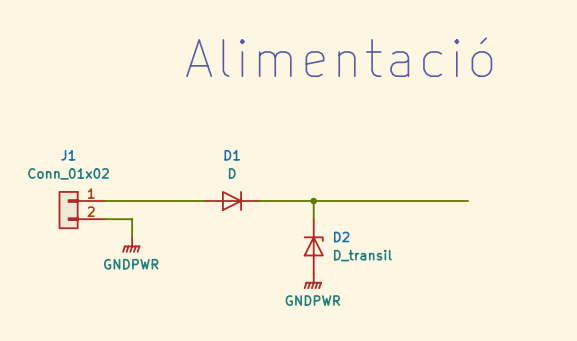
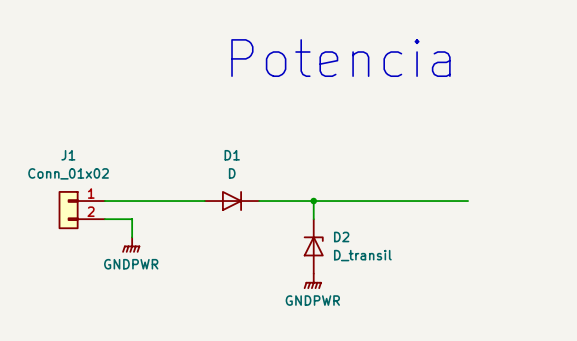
text: Alimentació (339, 57) -> Potencia (340, 58)

